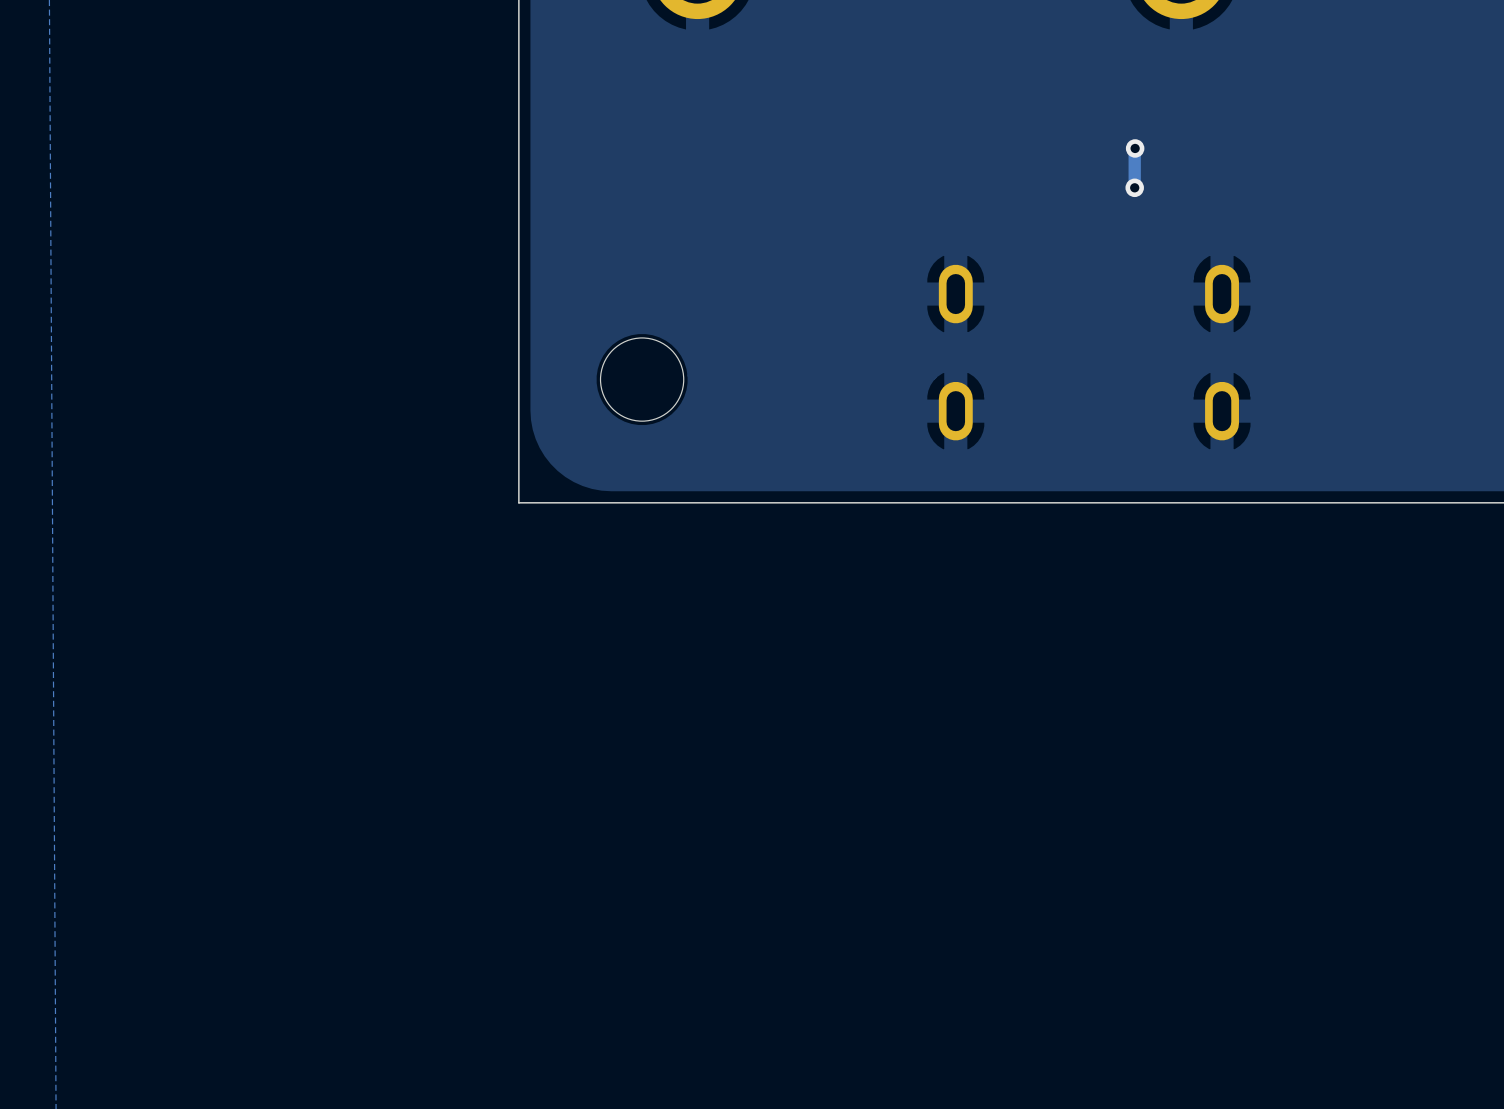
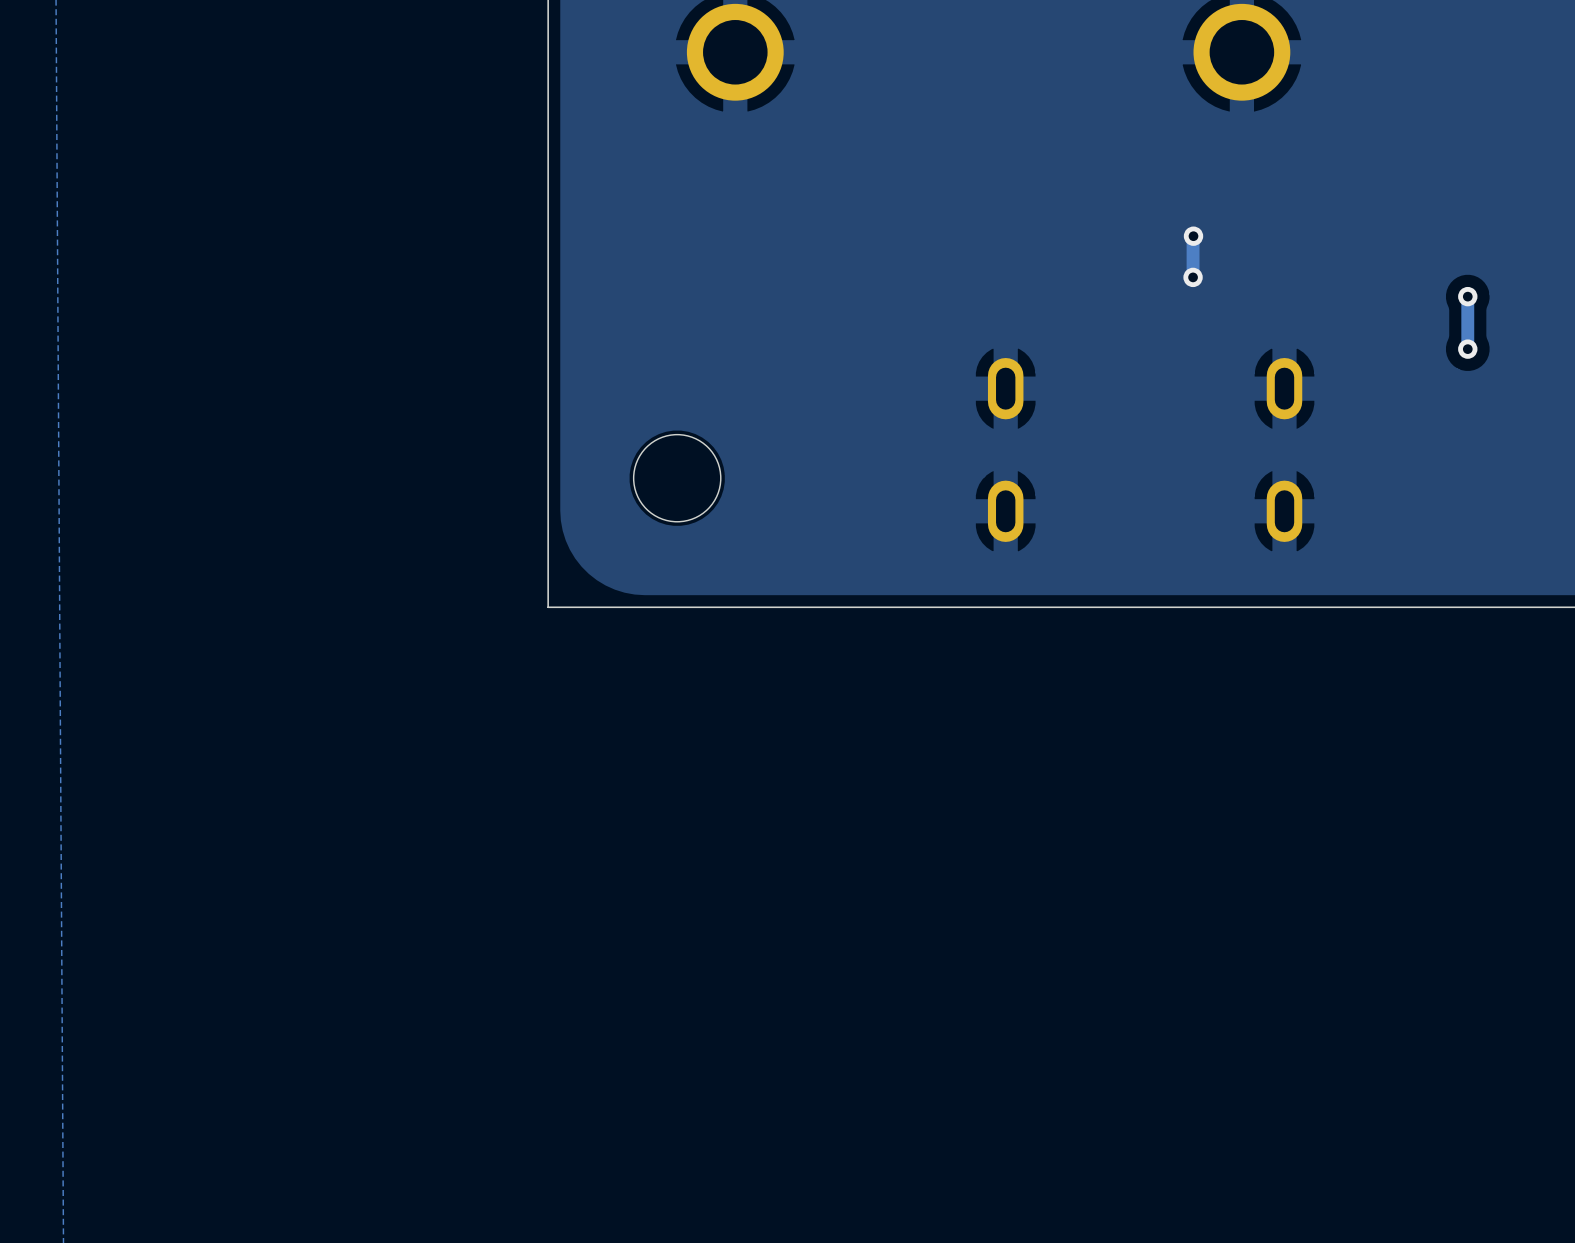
track: none -> (1467, 296) (1467, 349)
via: none -> (1467, 296)
via: none -> (1467, 349)

